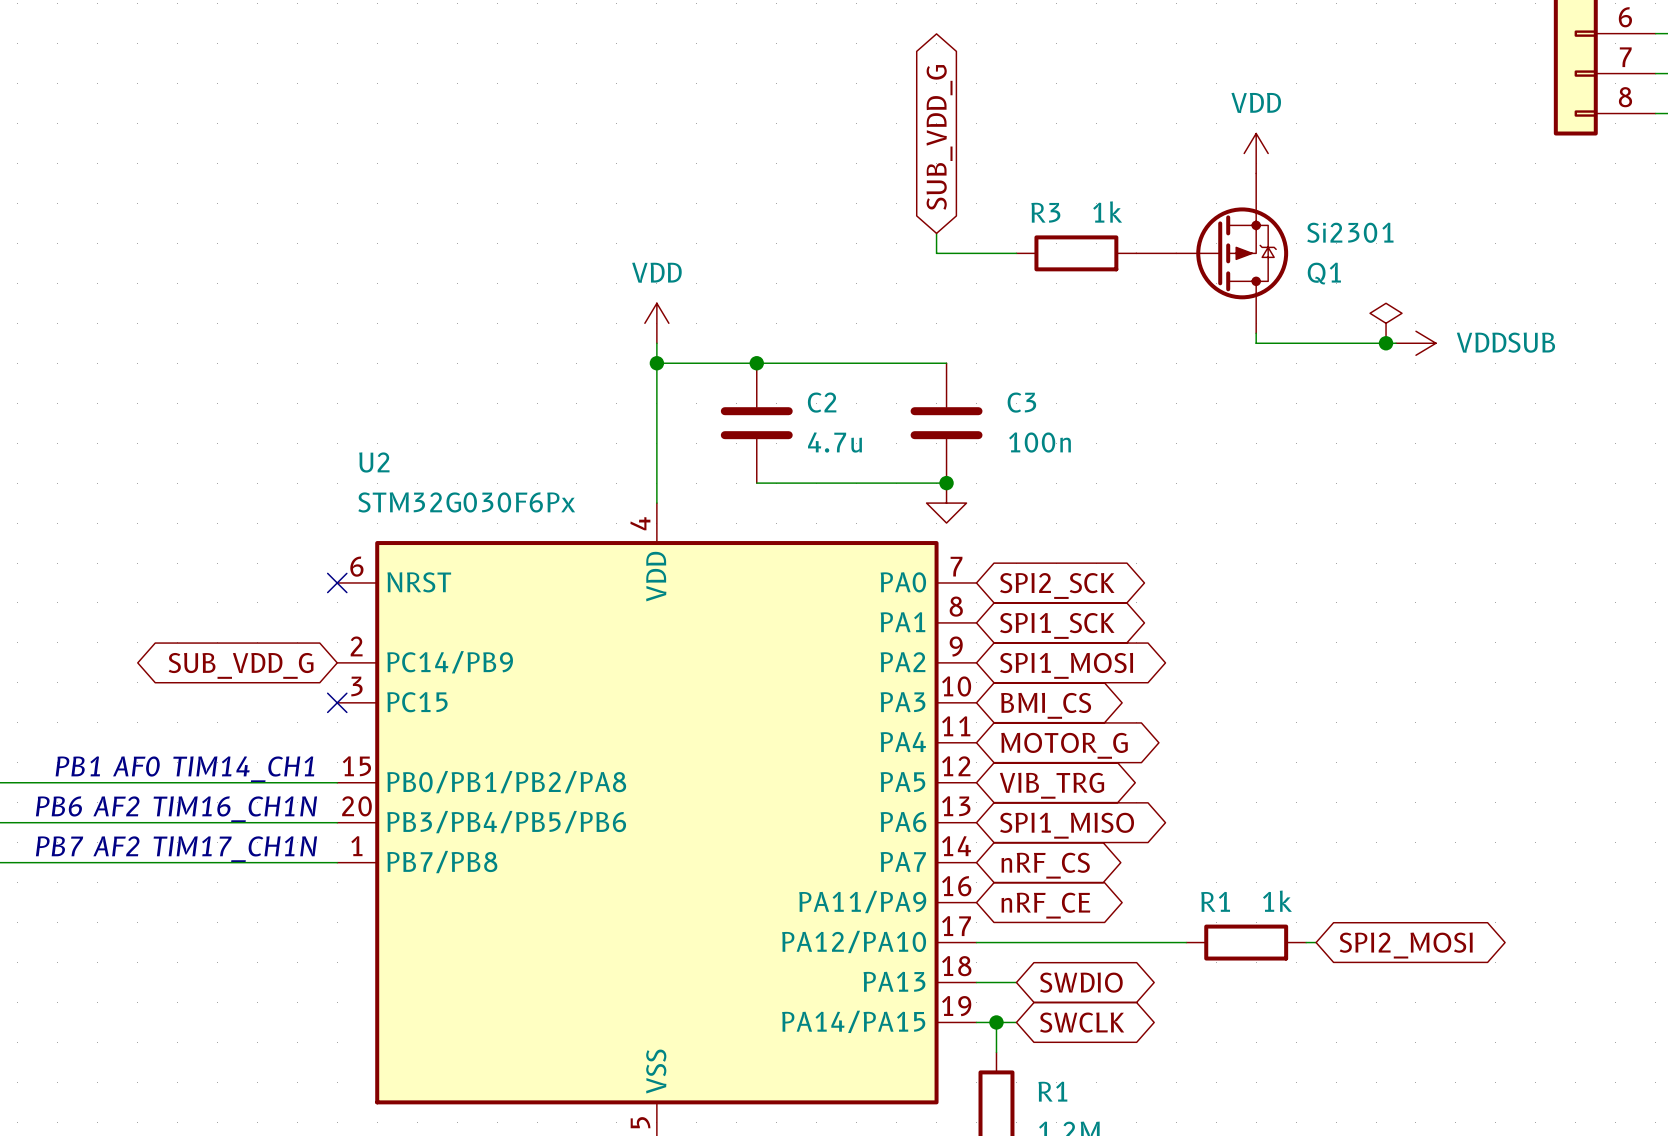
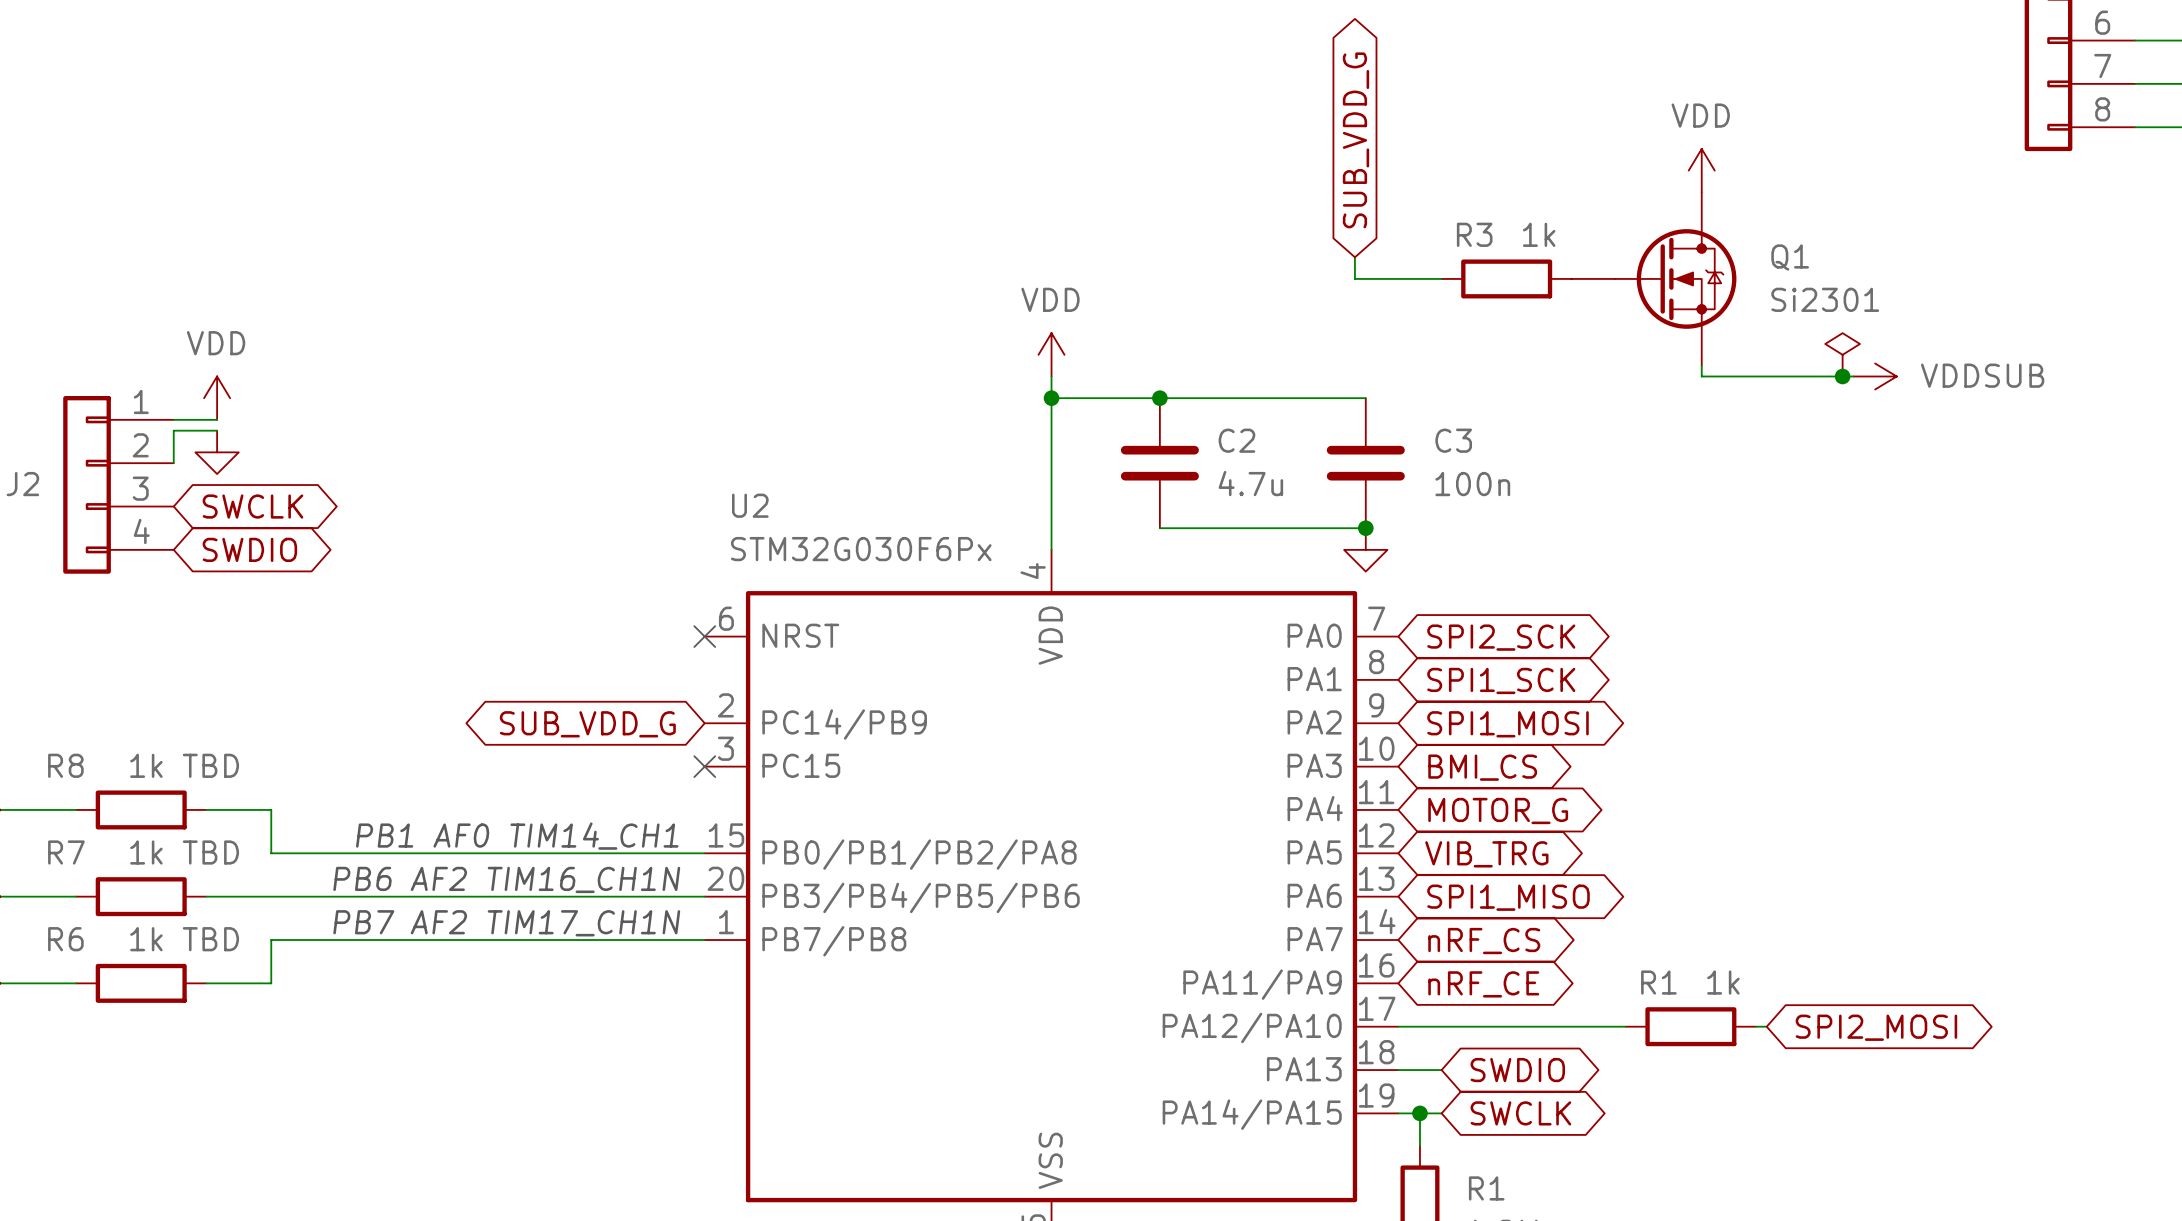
Q1 symbol: [1136, 173, 1289, 334] -> [1571, 192, 1737, 366]
Q1 value position: Si2301 (1350, 232) -> Si2301 (1825, 299)
Q1 name position: Q1 (1324, 273) -> Q1 (1790, 257)

